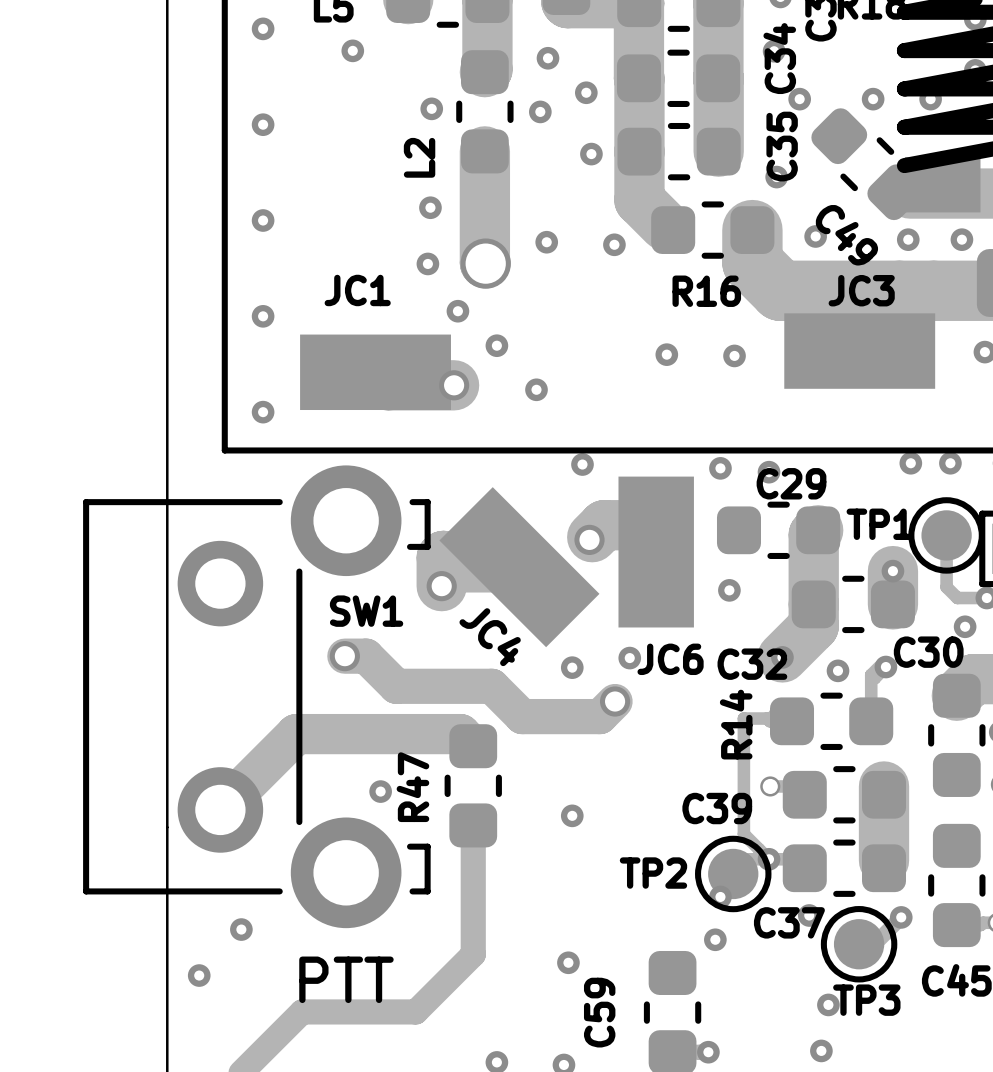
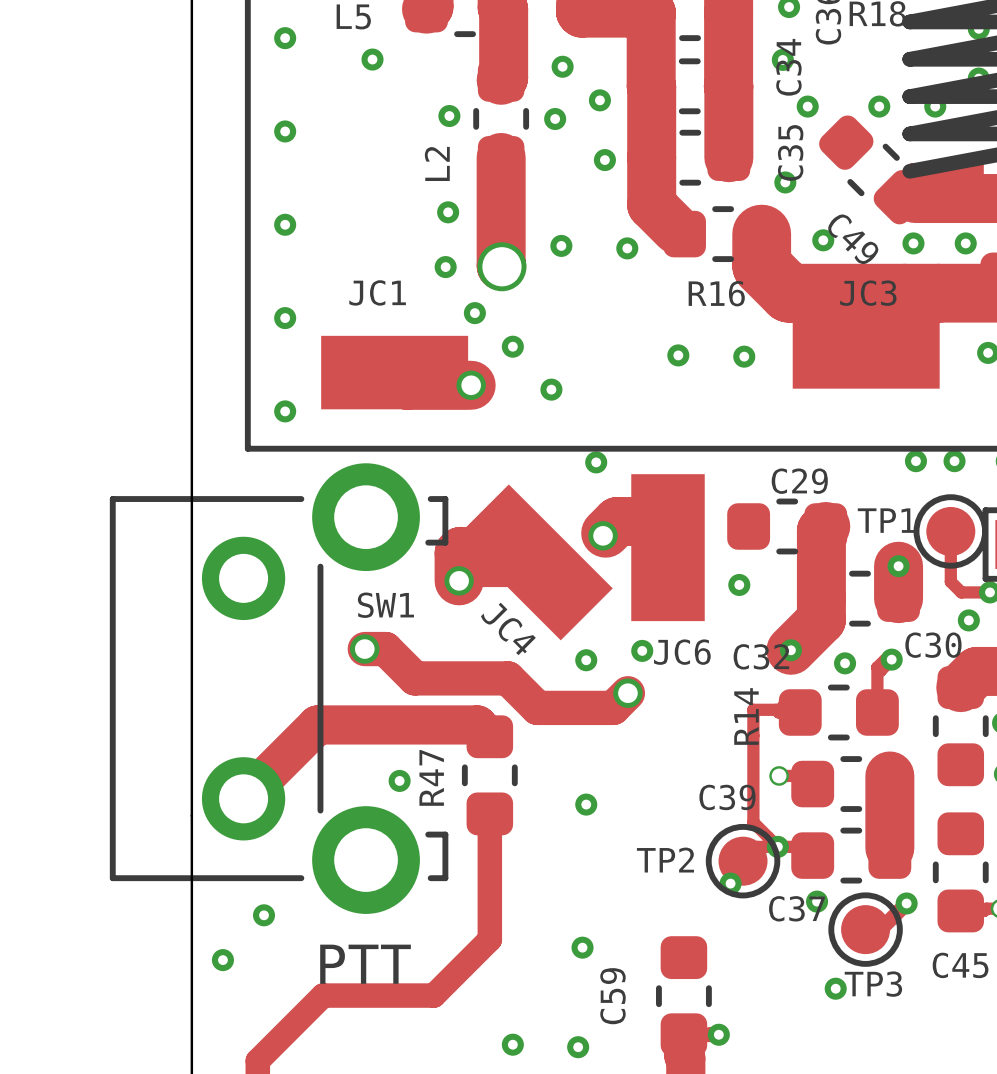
via: (720, 468) -> none
via: (769, 472) -> none
via: (715, 939) -> none
via: (821, 1050) -> none

